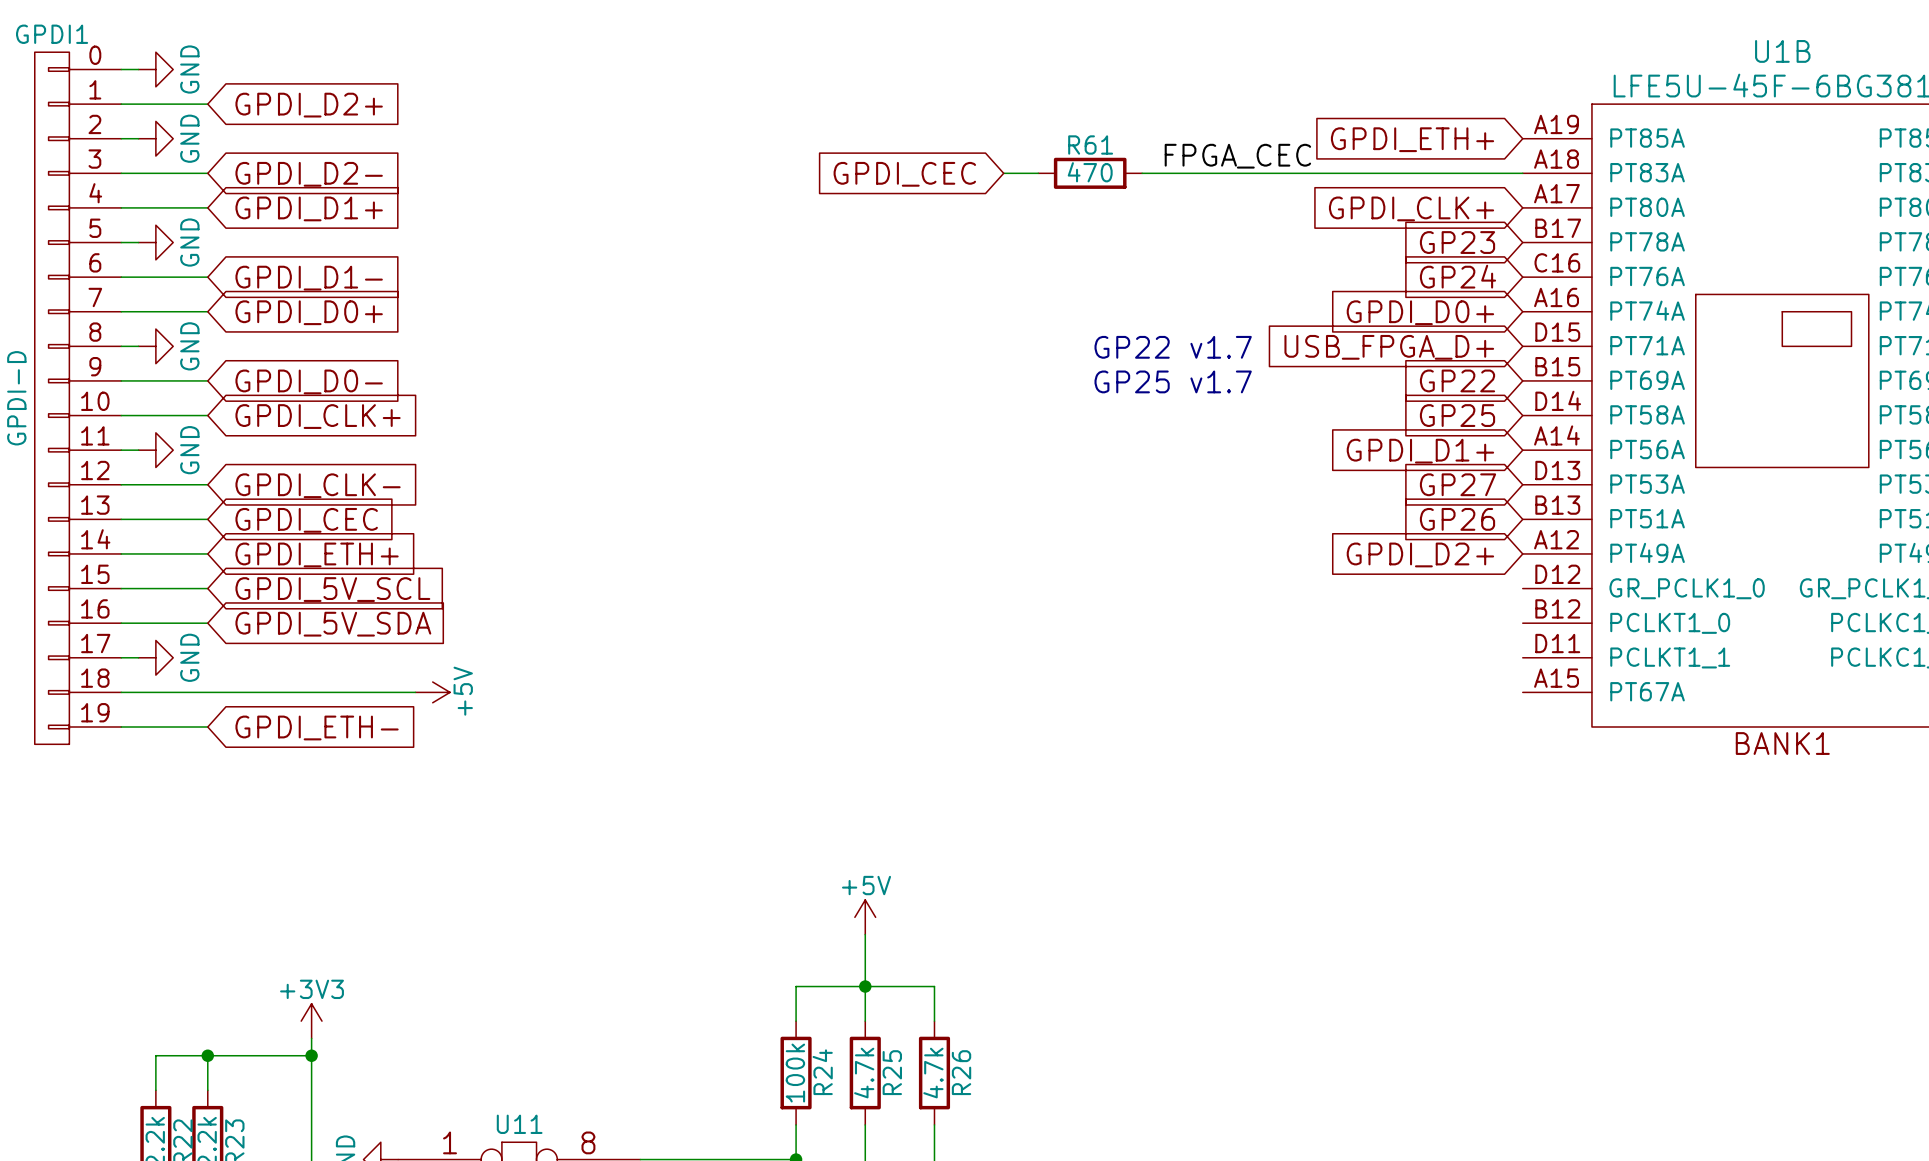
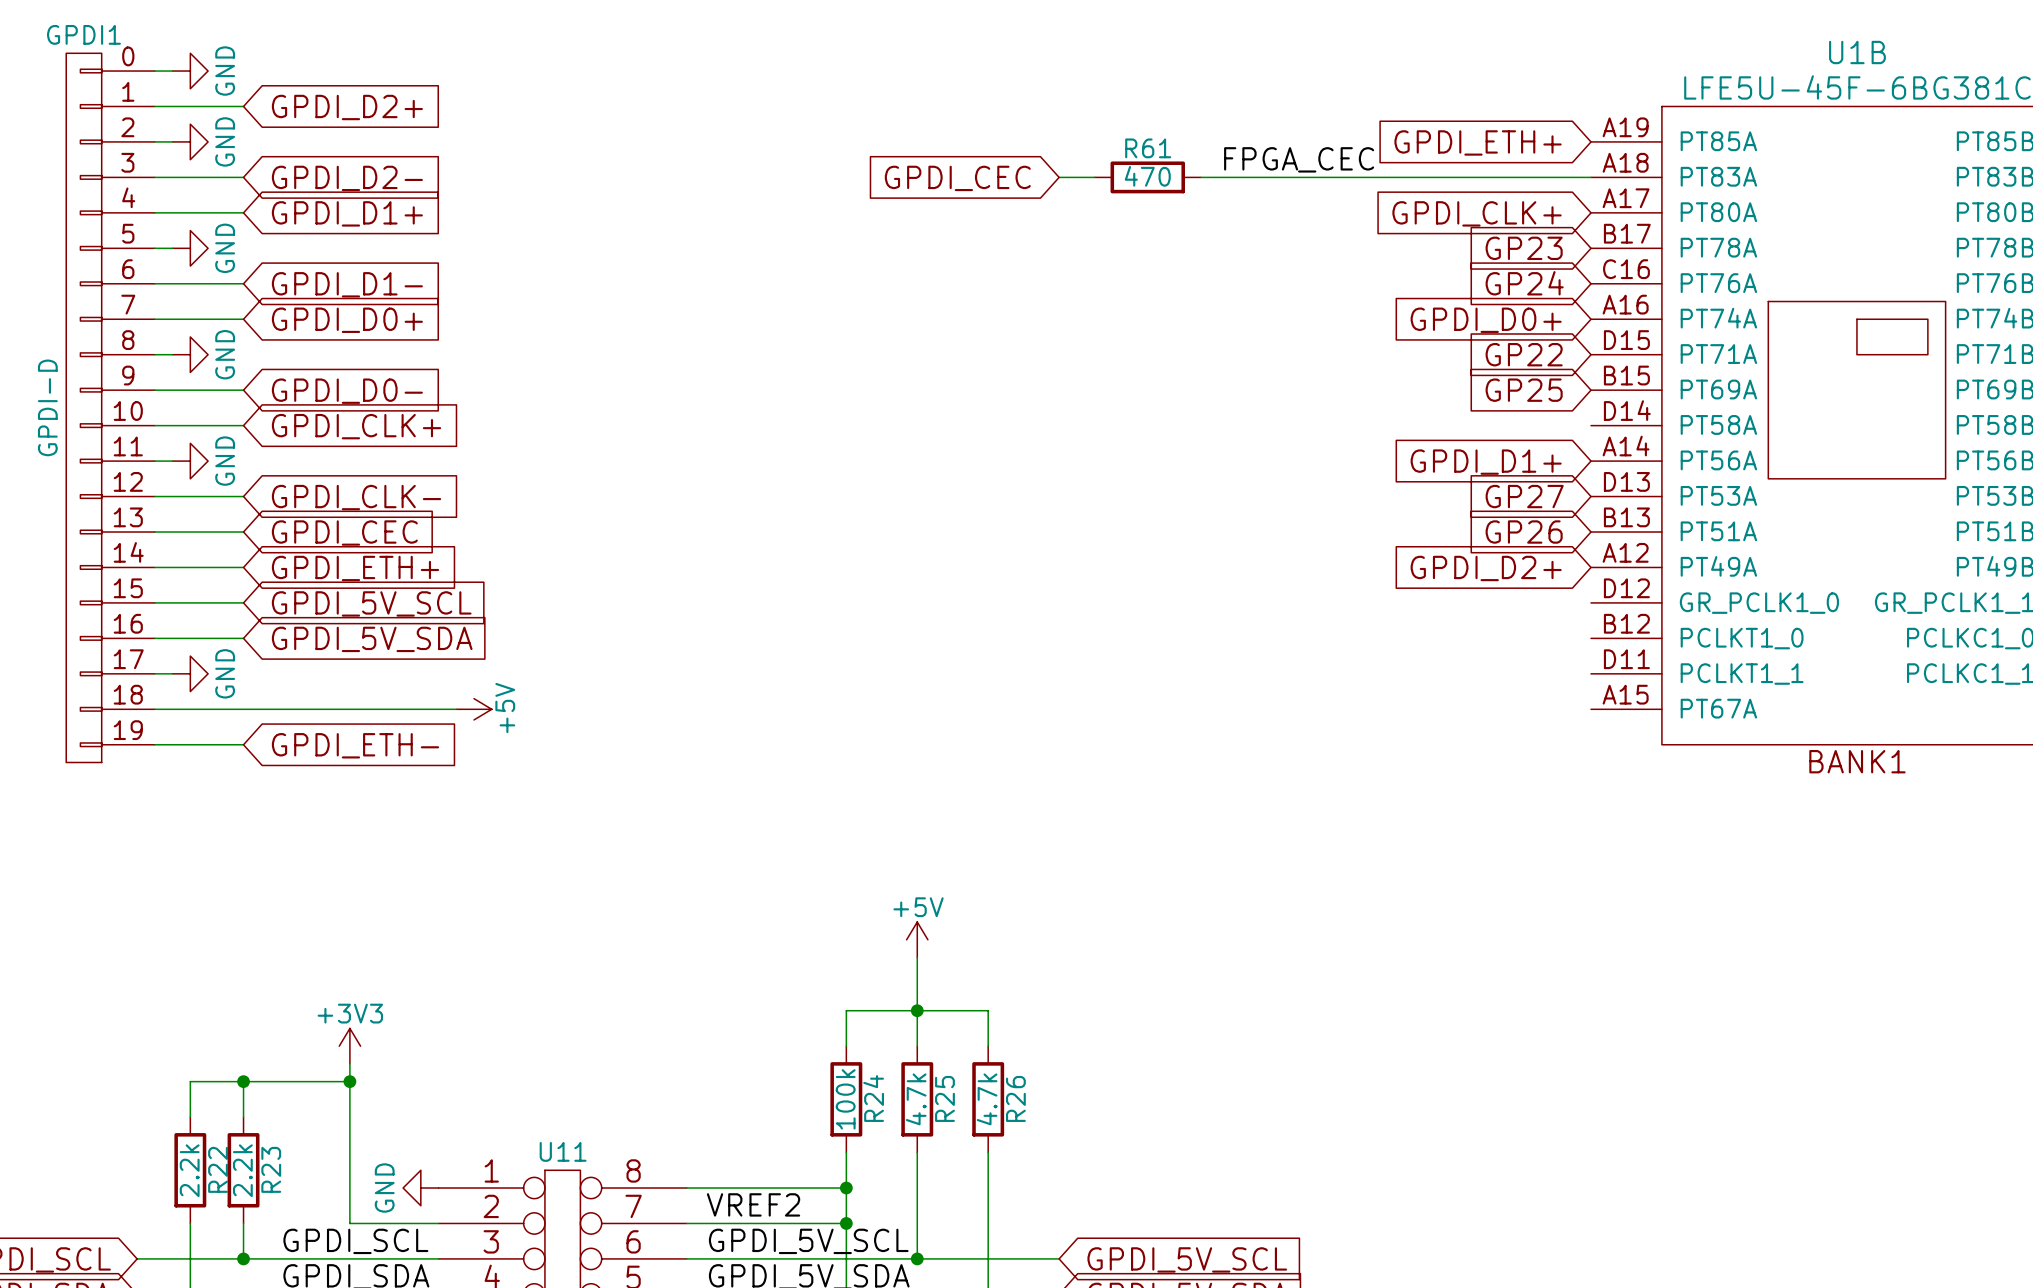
text: GP22 v1.7 (1173, 347) -> none
global label: USB_FPGA_D+ (1389, 347) -> GP22 (1524, 354)
global label: GP22 (1457, 380) -> GP25 (1524, 390)
text: GP25 v1.7 (1173, 381) -> none
global label: GP25 (1457, 415) -> none

